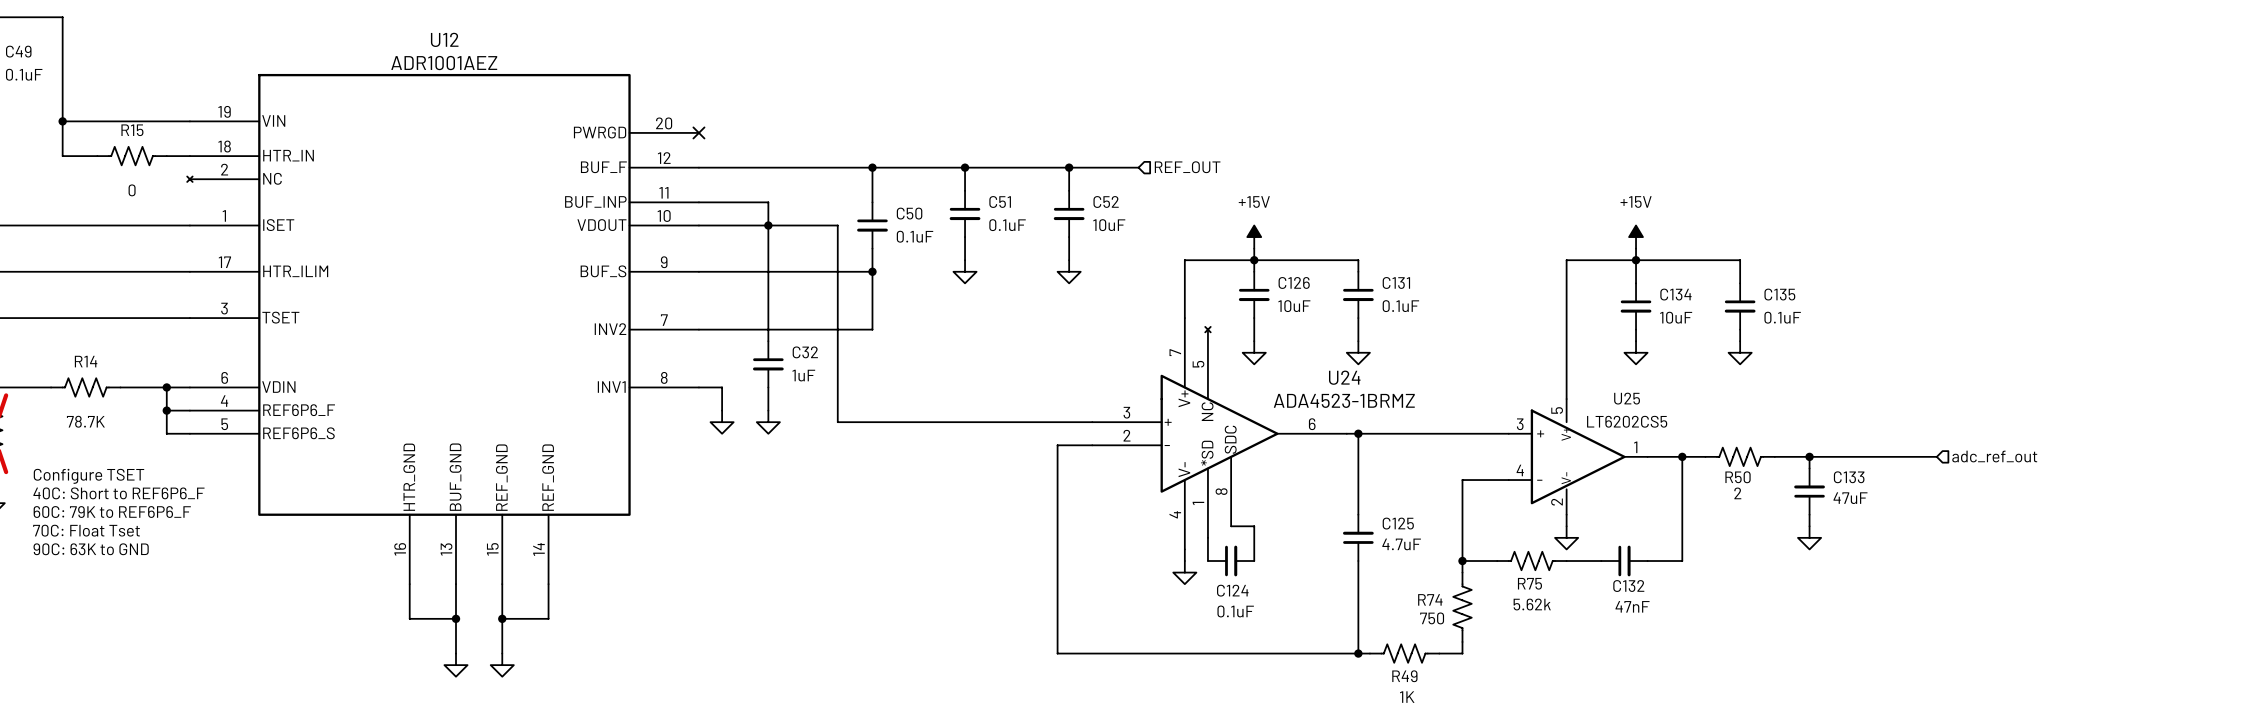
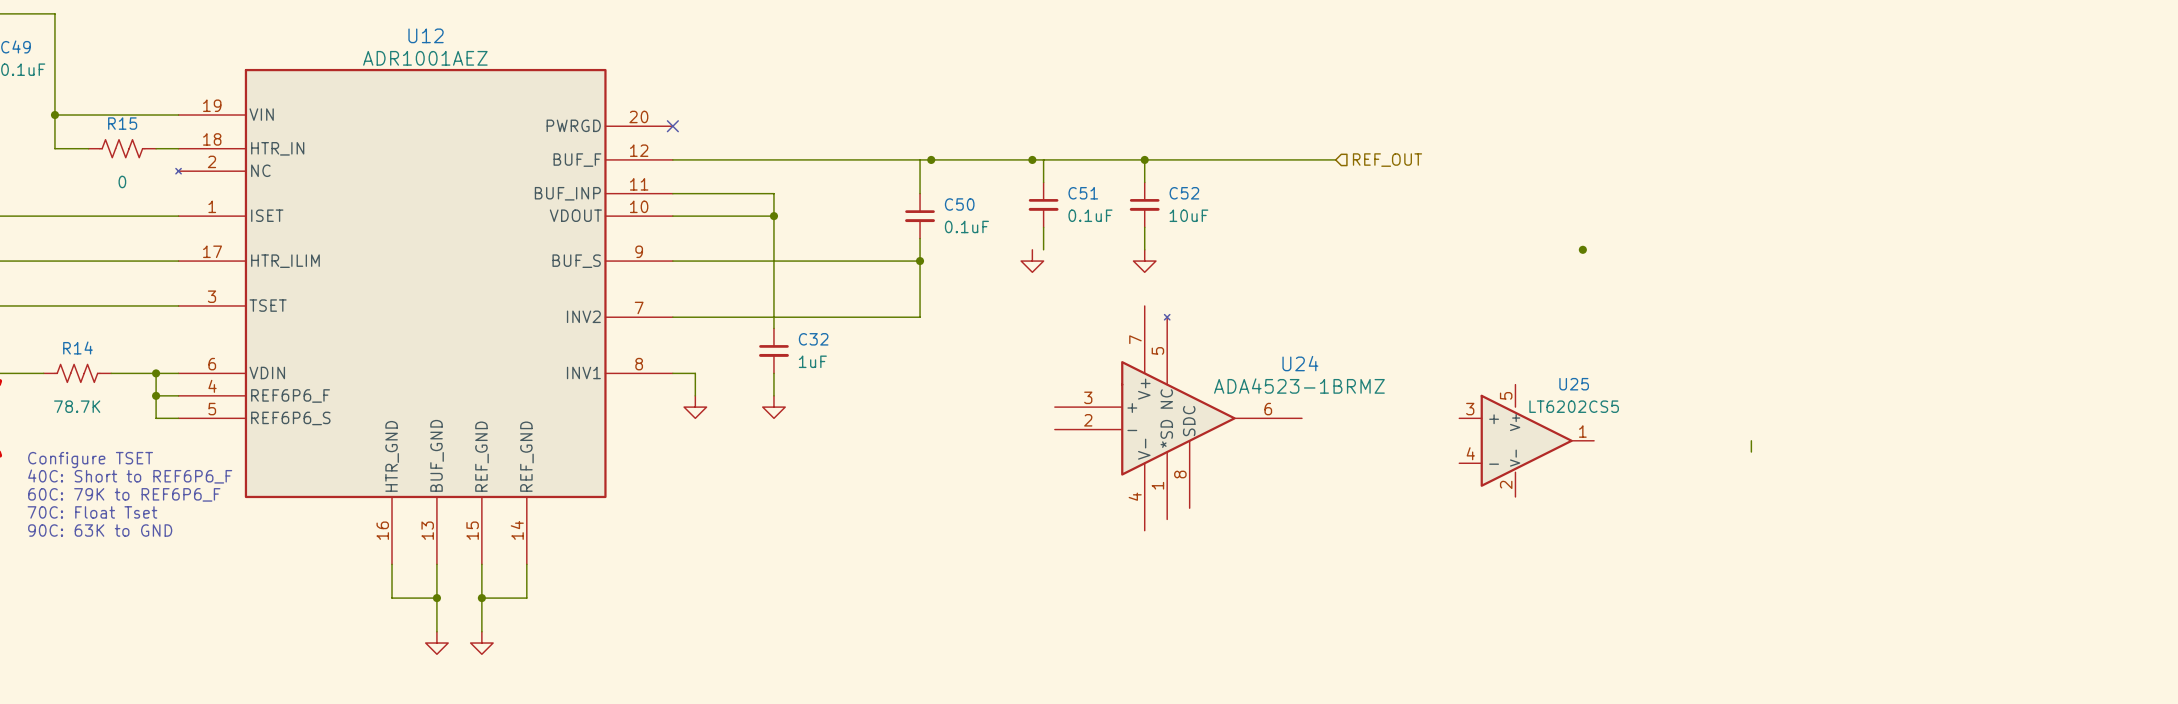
wire: (872, 167) (872, 202) -> (920, 159) (920, 193)
junction: (872, 167) -> none
wire: (965, 167) (965, 190) -> (1043, 159) (1043, 182)
wire: (1069, 167) (1069, 190) -> (1144, 159) (1144, 182)
wire: none -> (1099, 159) (1335, 159)
junction: none -> (1144, 159)
hierarchical label: REF_OUT (1187, 167) -> none
hierarchical label: none -> REF_OUT (1387, 160)
wire: (768, 202) (768, 341) -> (740, 193) (773, 193) (773, 328)
C51 position: (965, 213) -> (1043, 204)
C52 position: (1069, 213) -> (1144, 204)
junction position: (768, 225) -> (773, 216)
wire: (803, 225) (837, 225) (837, 422) (1092, 422) -> none
C50 position: (872, 225) -> (920, 216)
wire: (965, 237) (965, 260) -> (1043, 227) (1043, 249)
wire: (1069, 237) (1069, 260) -> (1144, 227) (1144, 249)
power symbol: +15V (1254, 237) -> none
power symbol: +15V (1636, 237) -> none
wire: (872, 248) (872, 329) -> (920, 238) (920, 317) (841, 317)
wire: (1254, 248) (1254, 271) -> none
wire: (1636, 248) (1636, 283) -> none
junction: (1254, 260) -> none
wire: none -> (841, 261) (920, 261)
junction: (872, 271) -> none
junction: none -> (920, 261)
power symbol: (965, 271) -> none
power symbol: none -> (1144, 261)
wire: (1358, 271) (1358, 260) (1184, 260) (1184, 318) -> none
wire: (1740, 283) (1740, 260) (1566, 260) (1566, 399) -> none
C126: 10uF (1254, 294) -> none
C131: 0.1uF (1358, 294) -> none
C134: 10uF (1636, 306) -> none
C135: 0.1uF (1740, 306) -> none
wire: (1254, 318) (1254, 341) -> none
wire: (1358, 318) (1358, 341) -> none
wire: (1636, 329) (1636, 341) -> none
wire: (1740, 329) (1740, 341) -> none
power symbol: (1254, 352) -> none
power symbol: (1358, 352) -> none
power symbol: (1636, 352) -> none
power symbol: (1740, 352) -> none
C32 position: (768, 364) -> (773, 350)
wire: (768, 387) (768, 410) -> (773, 373) (773, 395)
power symbol position: (768, 422) -> (773, 407)
wire: (1346, 433) (1508, 433) -> none
wire: (1358, 433) (1358, 514) -> none
junction: (1358, 433) -> none
wire: (1092, 445) (1057, 445) (1057, 653) (1369, 653) -> none
wire: (1647, 456) (1705, 456) -> none
wire: (1682, 456) (1682, 561) (1647, 561) -> none
junction: (1682, 456) -> none
R50: 2 (1740, 456) -> none
wire: (1774, 456) (1936, 456) -> none
junction: (1809, 456) -> none
hierarchical label: adc_ref_out (1994, 456) -> none
wire: (1508, 480) (1462, 480) (1462, 572) -> none
C133: 47uF (1809, 491) -> none
wire: (1566, 514) (1566, 526) -> none
wire: (1809, 514) (1809, 526) -> none
wire: (1231, 526) (1254, 526) (1254, 561) -> none
wire: (1207, 537) (1207, 561) -> none
C125: 4.7uF (1358, 537) -> none
power symbol: (1566, 537) -> none
power symbol: (1809, 537) -> none
wire: (1184, 549) (1184, 561) -> none
C124: 0.1uF (1231, 561) -> none
wire: (1358, 561) (1358, 653) -> none
wire: (1462, 561) (1497, 561) -> none
junction: (1462, 561) -> none
R75: 5.62k (1531, 561) -> none
wire: (1566, 561) (1601, 561) -> none
C132: 47nF (1624, 561) -> none
power symbol: (1184, 572) -> none
R74: 750 (1462, 607) -> none
wire: (1462, 641) (1462, 653) (1439, 653) -> none
junction: (1358, 653) -> none
R49: 1K (1404, 653) -> none

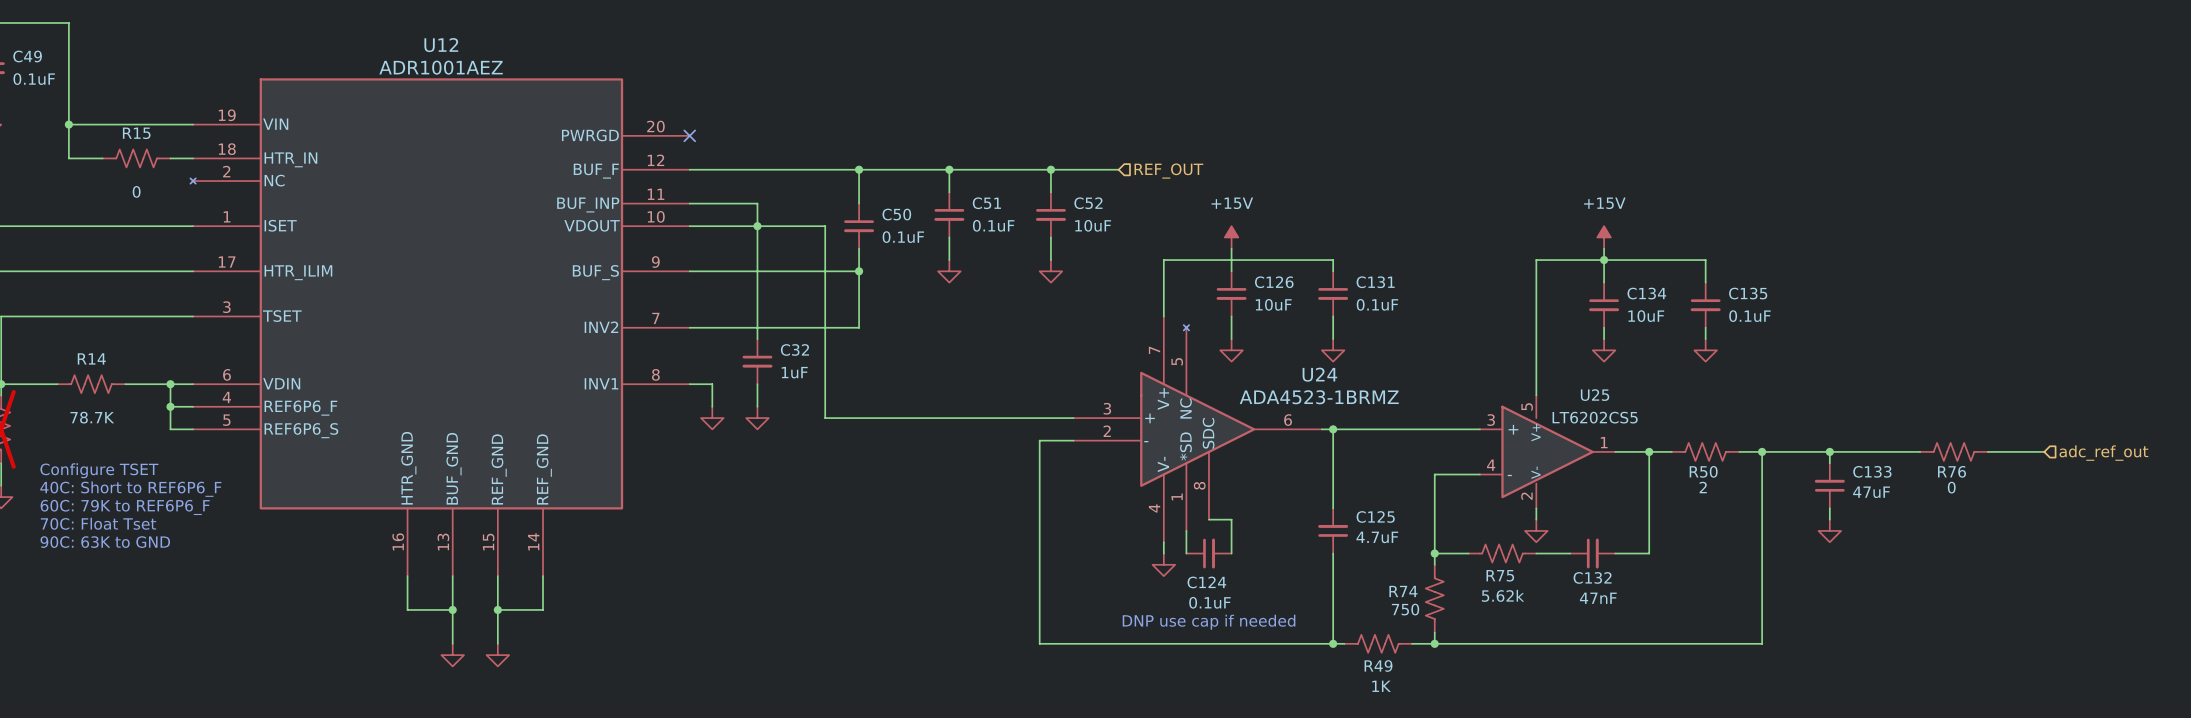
junction: none -> (859, 169)
wire: (920, 159) (920, 193) -> (859, 169) (859, 203)
wire: (1043, 159) (1043, 182) -> (949, 169) (949, 192)
wire: (1099, 159) (1335, 159) -> none
wire: (1144, 159) (1144, 182) -> (1050, 169) (1050, 192)
junction: (1144, 159) -> none
hierarchical label: none -> REF_OUT (1168, 171)
hierarchical label: REF_OUT (1387, 160) -> none
wire: (740, 193) (773, 193) (773, 328) -> (757, 203) (757, 339)
C51 position: (1043, 204) -> (949, 214)
C52 position: (1144, 204) -> (1050, 214)
wire: none -> (791, 226) (825, 226) (825, 418) (1073, 418)
junction position: (773, 216) -> (757, 226)
C50 position: (920, 216) -> (859, 226)
wire: (1043, 227) (1043, 249) -> (949, 237) (949, 260)
wire: (1144, 227) (1144, 249) -> (1050, 237) (1050, 260)
power symbol: none -> +15V (1231, 237)
power symbol: none -> +15V (1604, 237)
wire: (920, 238) (920, 317) (841, 317) -> (859, 248) (859, 327)
wire: none -> (1231, 248) (1231, 271)
wire: none -> (1604, 248) (1604, 282)
wire: (841, 261) (920, 261) -> none
junction: none -> (859, 271)
junction: (920, 261) -> none
power symbol: none -> (949, 271)
power symbol: (1144, 261) -> none
wire: none -> (1333, 271) (1333, 260) (1163, 260) (1163, 316)
wire: none -> (1705, 282) (1705, 260) (1536, 260) (1536, 395)
C126: none -> 10uF (1231, 293)
C131: none -> 0.1uF (1333, 293)
C134: none -> 10uF (1604, 305)
C135: none -> 0.1uF (1705, 305)
wire: none -> (1231, 316) (1231, 339)
wire: none -> (1333, 316) (1333, 339)
wire: none -> (1604, 327) (1604, 339)
wire: none -> (1705, 327) (1705, 339)
power symbol: none -> (1231, 350)
power symbol: none -> (1333, 350)
power symbol: none -> (1604, 350)
power symbol: none -> (1705, 350)
C32 position: (773, 350) -> (757, 361)
wire: (773, 373) (773, 395) -> (757, 384) (757, 406)
power symbol position: (773, 407) -> (757, 418)
wire: none -> (1321, 429) (1479, 429)
wire: none -> (1333, 429) (1333, 508)
junction: none -> (1333, 429)
wire: none -> (1073, 440) (1039, 440) (1039, 643) (1344, 643)
wire: none -> (1615, 451) (1671, 451)
wire: none -> (1649, 451) (1649, 553) (1615, 553)
junction: none -> (1649, 451)
R50: none -> 2 (1705, 451)
wire: none -> (1739, 451) (1920, 451)
wire: none -> (1762, 451) (1762, 643) (1412, 643)
junction: none -> (1762, 451)
wire: (1751, 440) (1751, 452) -> (1829, 451) (1829, 463)
junction: none -> (1829, 451)
R76: none -> 0 (1953, 451)
wire: none -> (1987, 451) (2044, 451)
hierarchical label: none -> adc_ref_out (2103, 453)
wire: none -> (1479, 474) (1434, 474) (1434, 564)
C133: none -> 47uF (1829, 485)
wire: none -> (1536, 508) (1536, 519)
wire: none -> (1829, 508) (1829, 519)
wire: none -> (1208, 519) (1231, 519) (1231, 553)
wire: none -> (1186, 530) (1186, 553)
C125: none -> 4.7uF (1333, 530)
power symbol: none -> (1536, 530)
power symbol: none -> (1829, 530)
wire: none -> (1163, 542) (1163, 553)
C124: none -> 0.1uF (1208, 553)
wire: none -> (1333, 553) (1333, 643)
wire: none -> (1434, 553) (1468, 553)
junction: none -> (1434, 553)
R75: none -> 5.62k (1502, 553)
wire: none -> (1536, 553) (1570, 553)
C132: none -> 47nF (1592, 553)
power symbol: none -> (1163, 564)
R74: none -> 750 (1434, 598)
text: none -> DNP use cap if needed (1209, 622)
wire: none -> (1434, 632) (1434, 643)
junction: none -> (1333, 643)
R49: none -> 1K (1378, 643)
junction: none -> (1434, 643)

